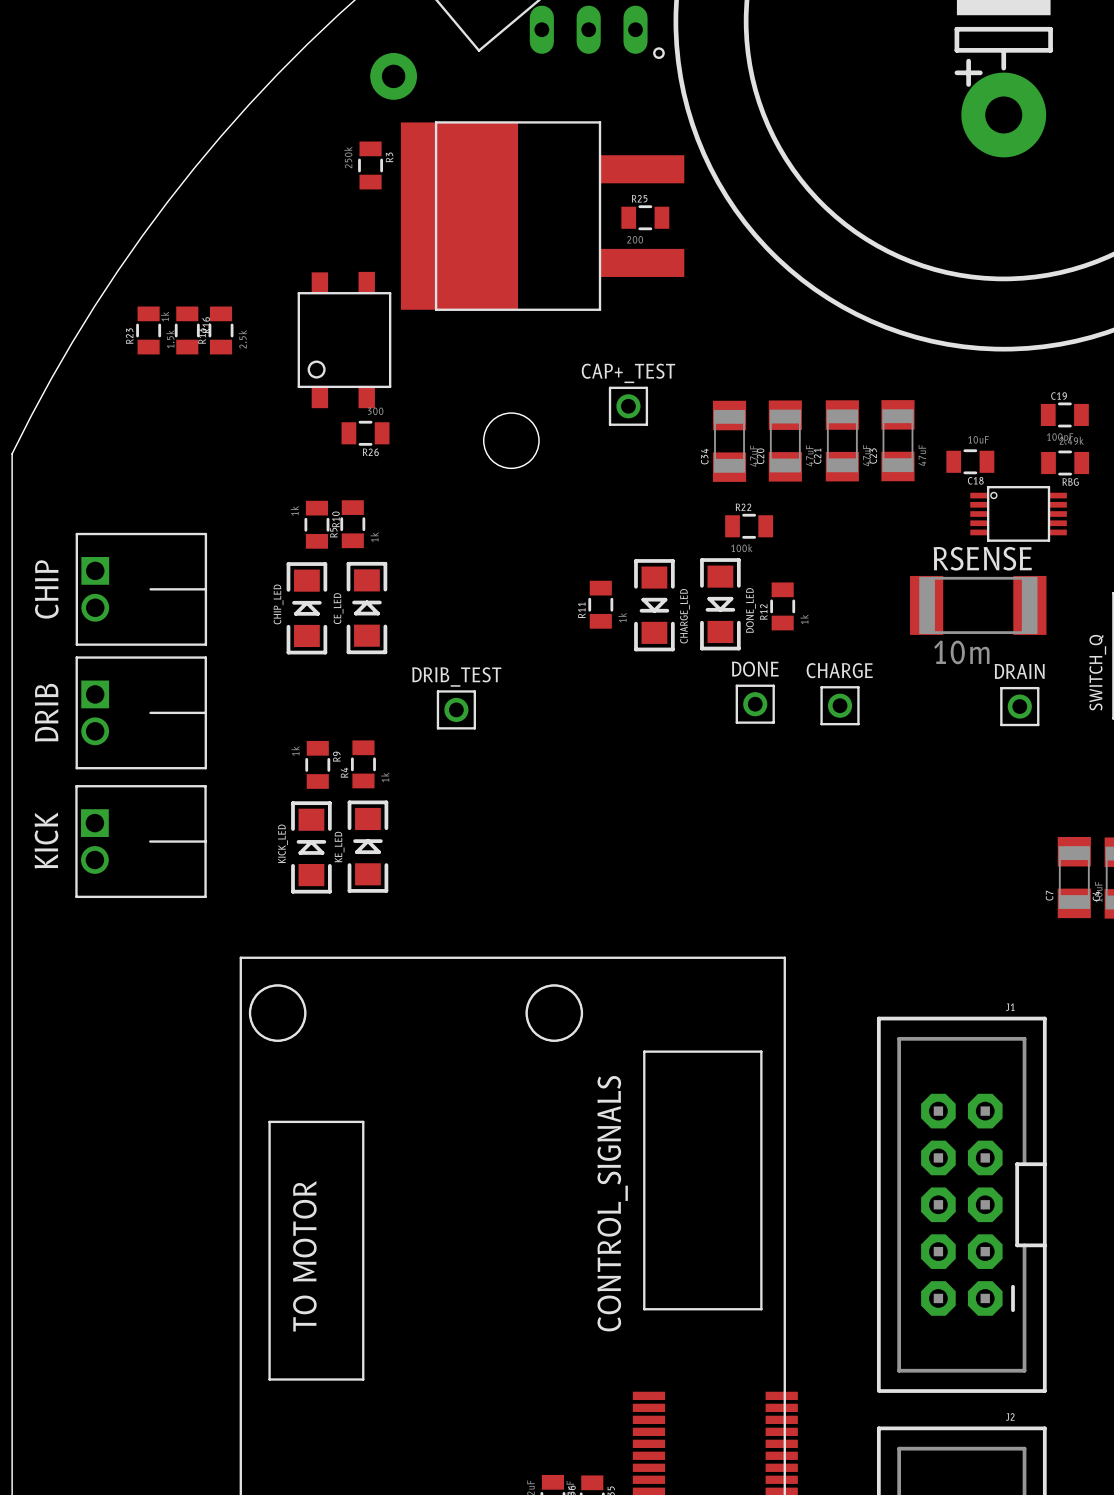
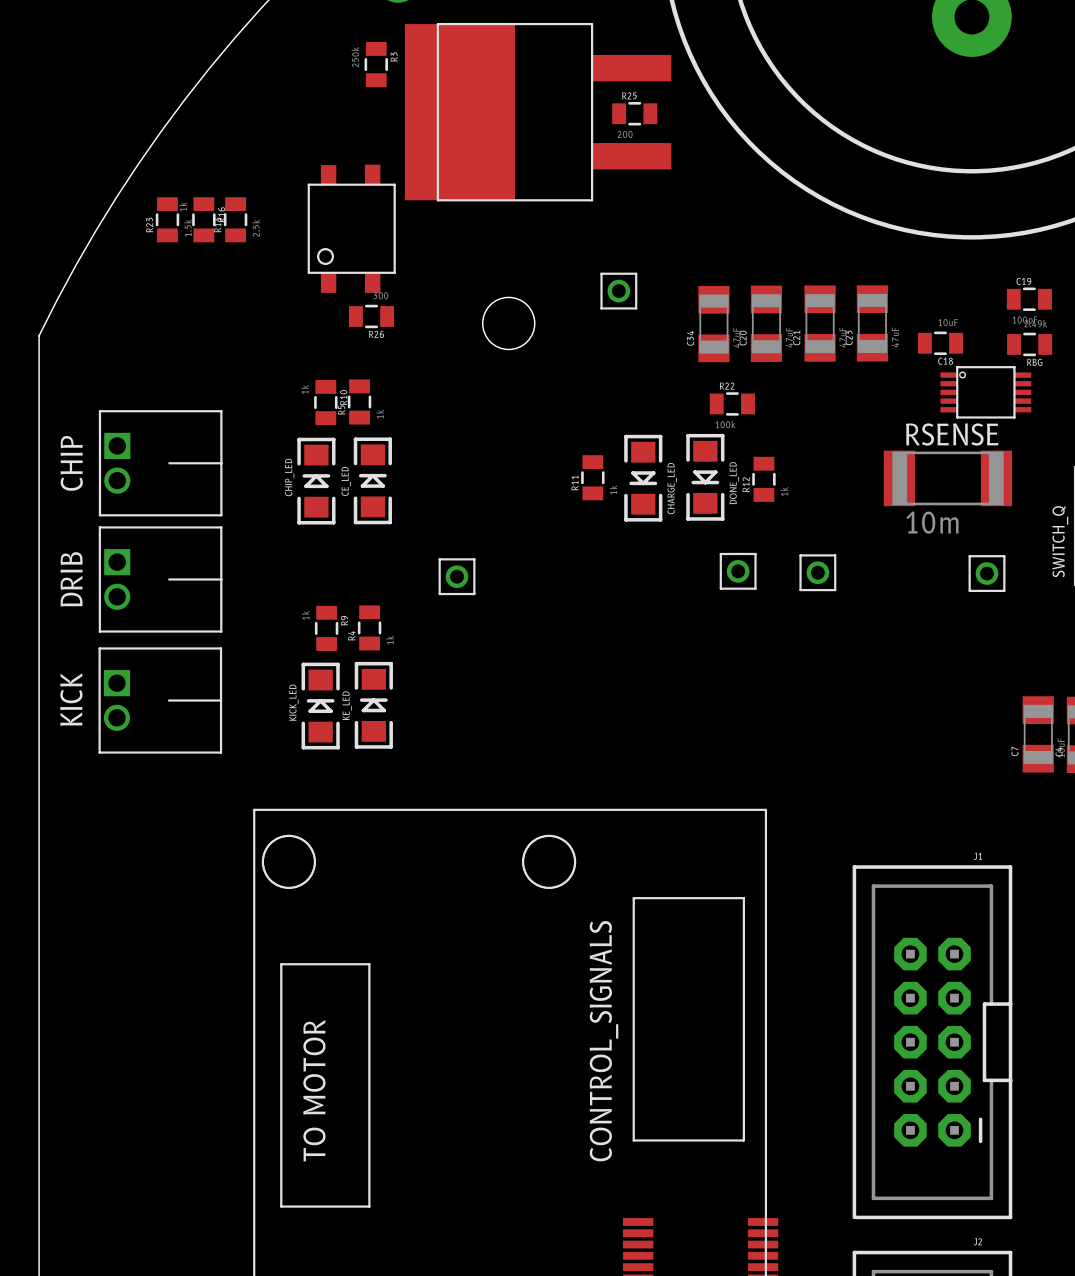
CAP+_TEST name: CAP+_TEST (628, 373) -> none
DONE name: DONE (755, 669) -> none
CHARGE name: CHARGE (839, 670) -> none
DRAIN name: DRAIN (1019, 671) -> none
DRIB_TEST name: DRIB_TEST (456, 676) -> none

